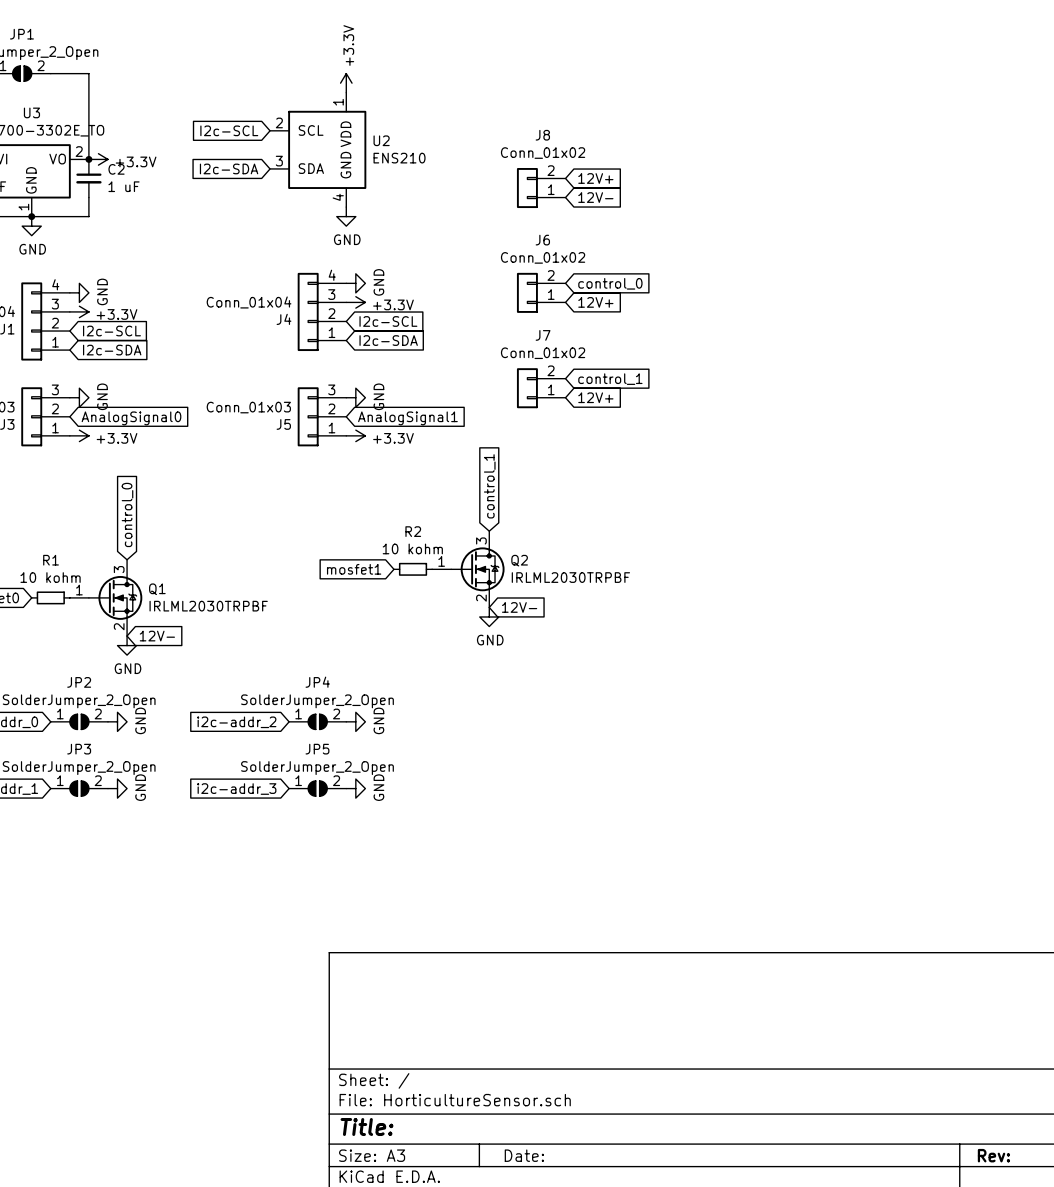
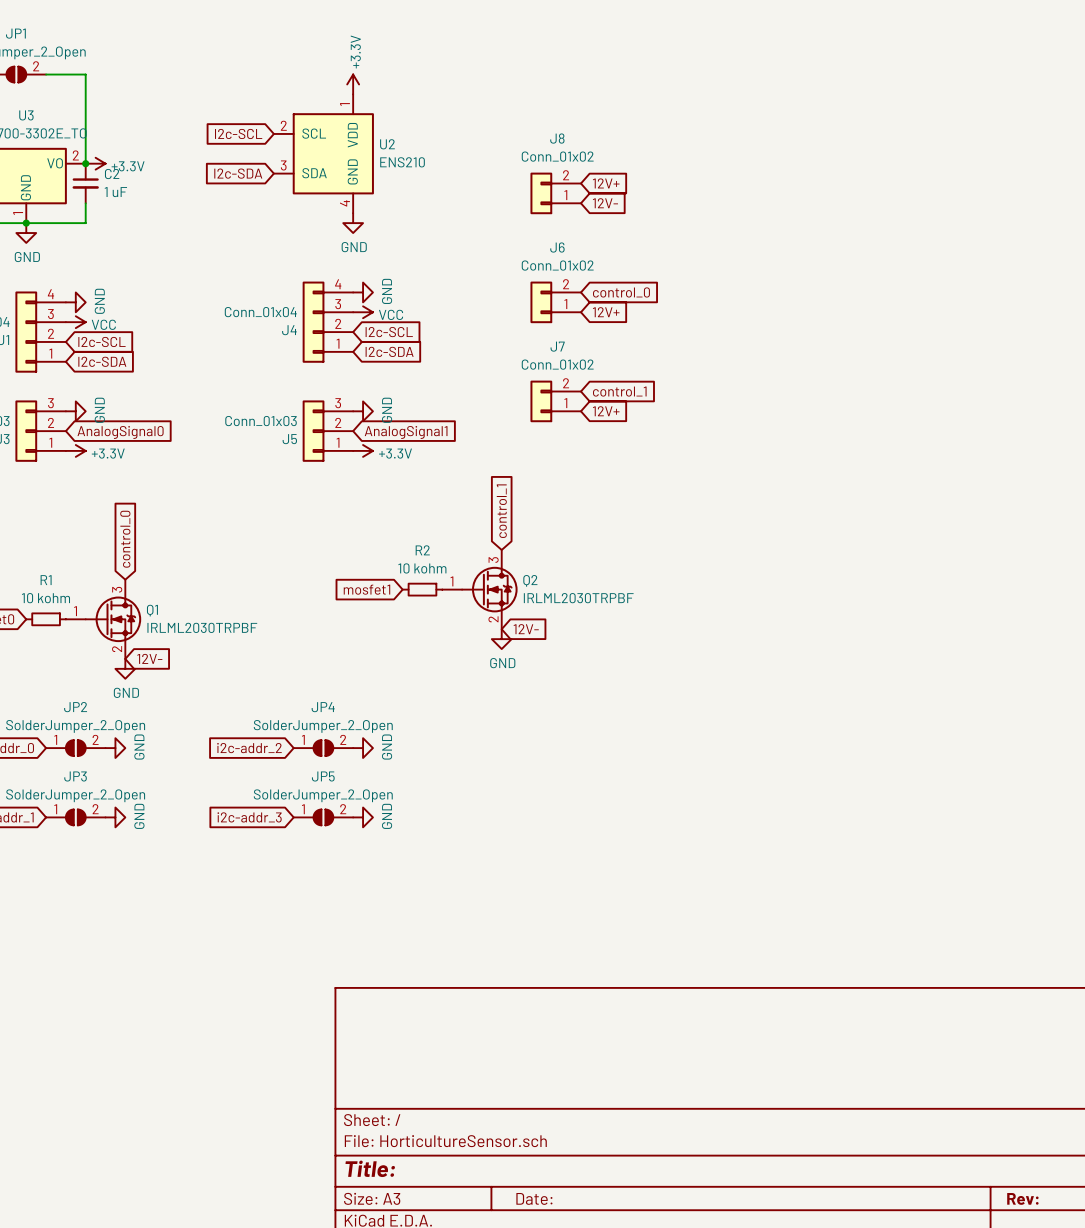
power symbol: +3.3V (355, 302) -> VCC (363, 312)
power symbol: +3.3V (79, 311) -> VCC (75, 322)

